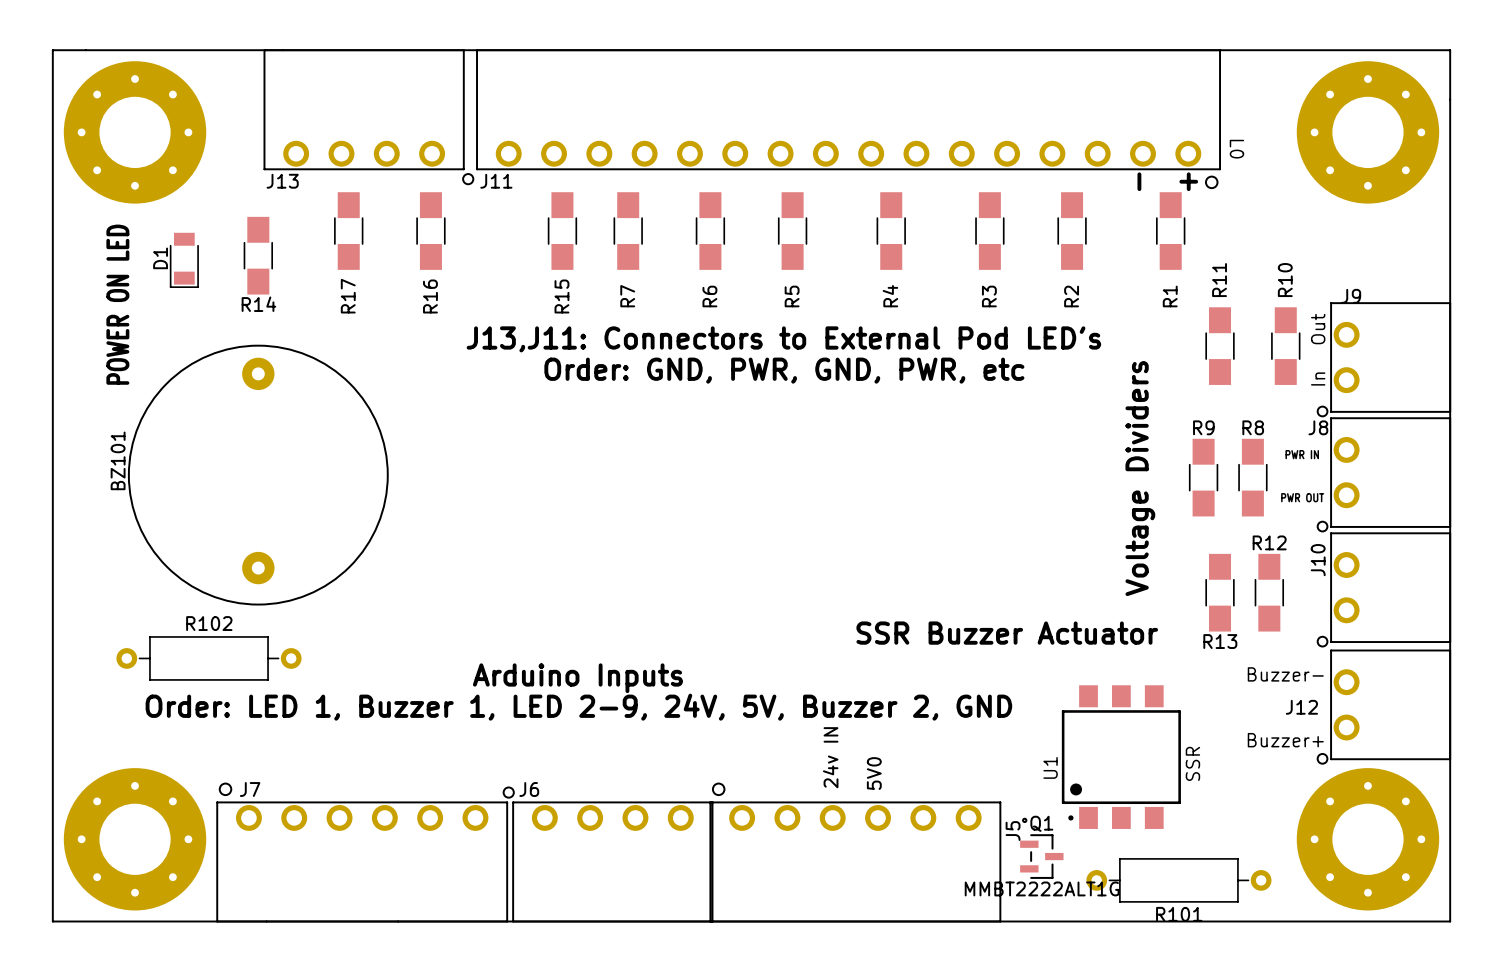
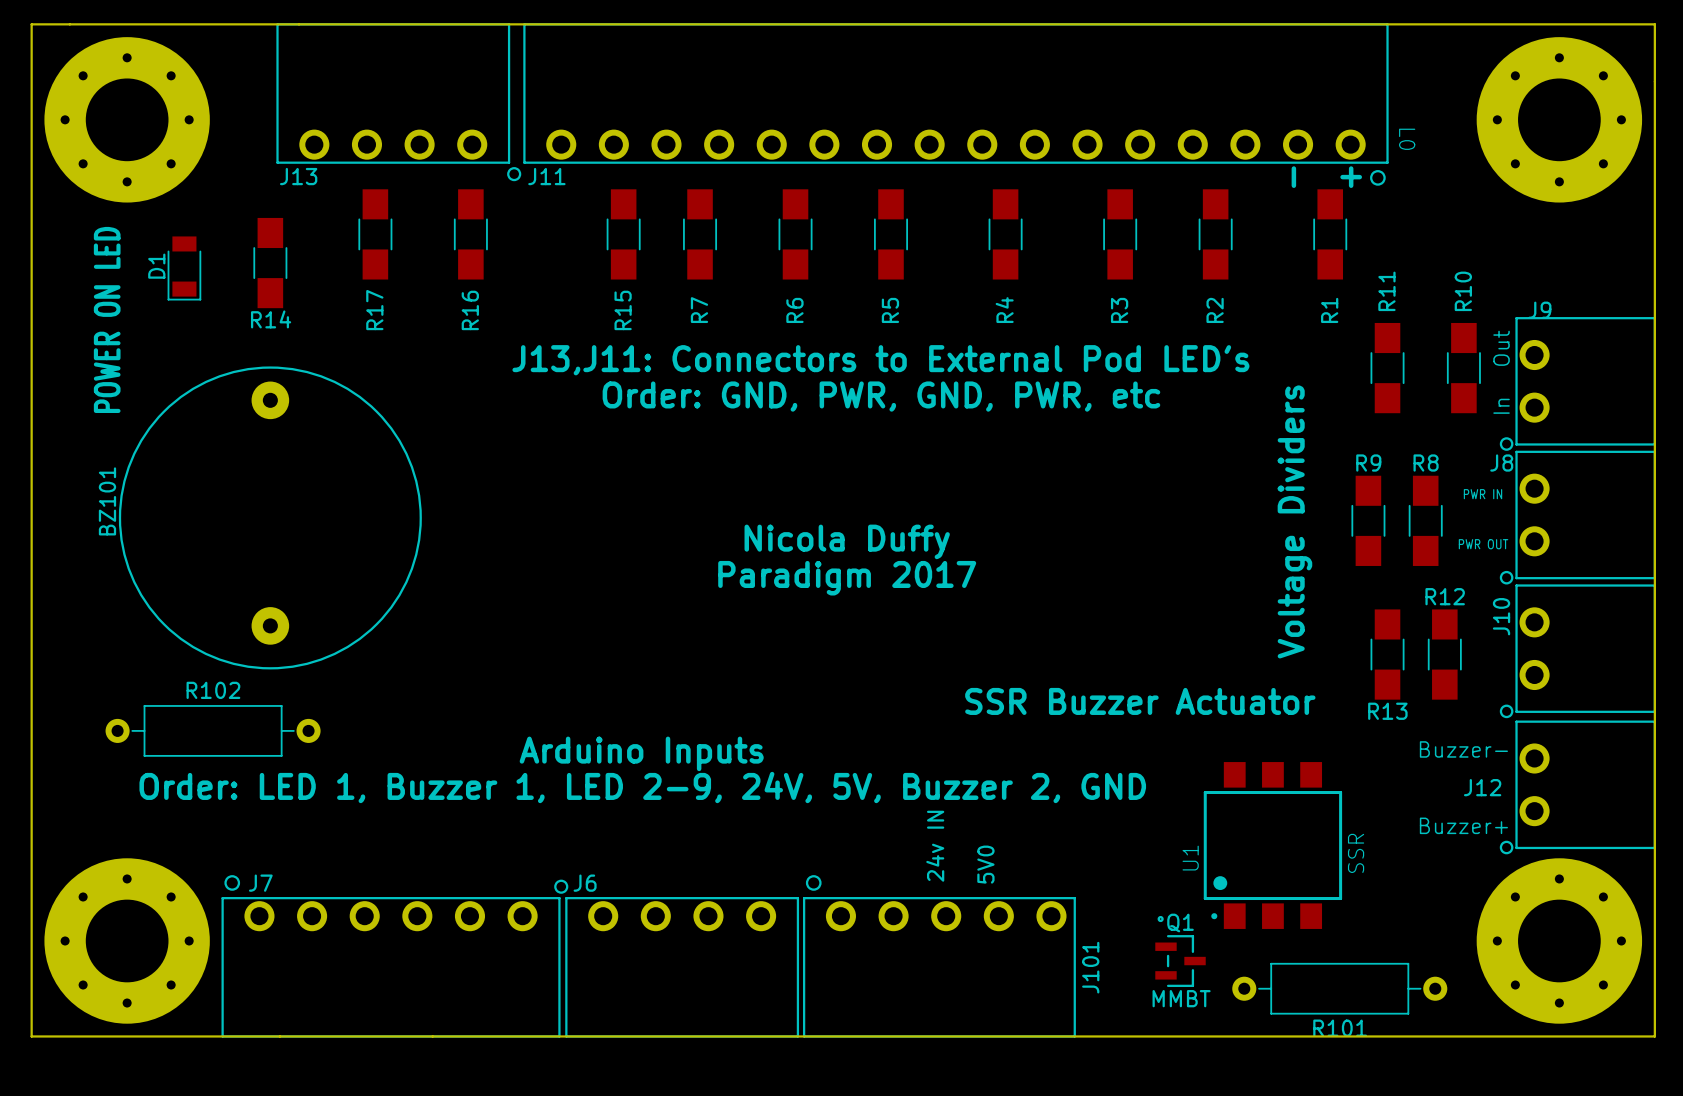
text: none -> Nicola Duffy (847, 541)
text: none -> Paradigm 2017 (847, 578)
J101: none -> (939, 956)
J5: (855, 852) -> none
Q1 value: MMBT2222ALT1G (1042, 888) -> MMBT (1181, 998)

